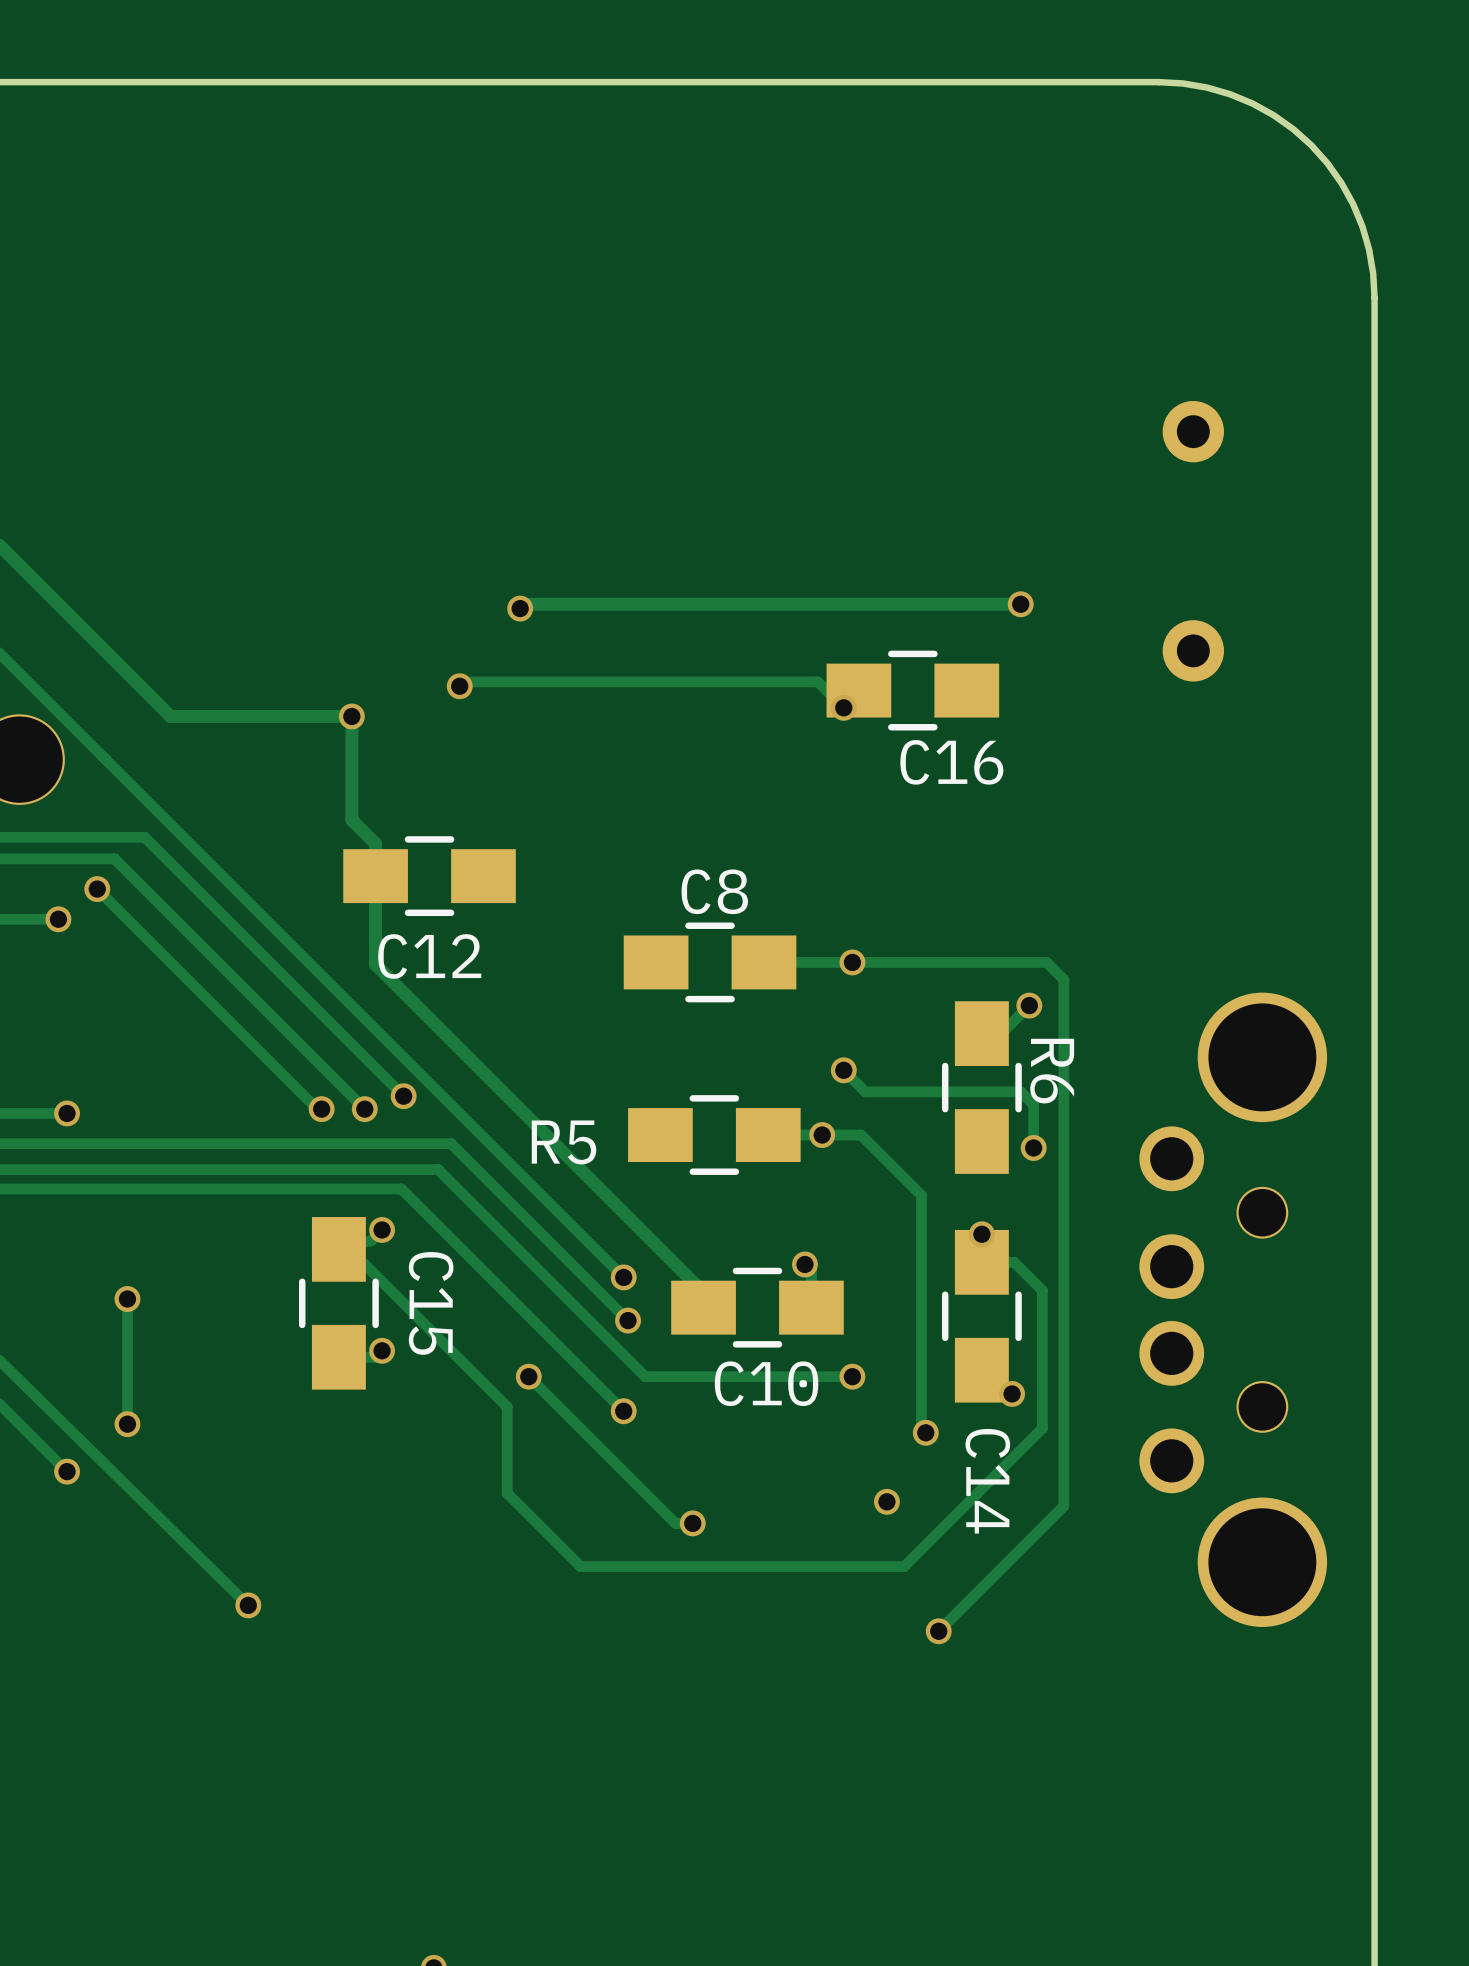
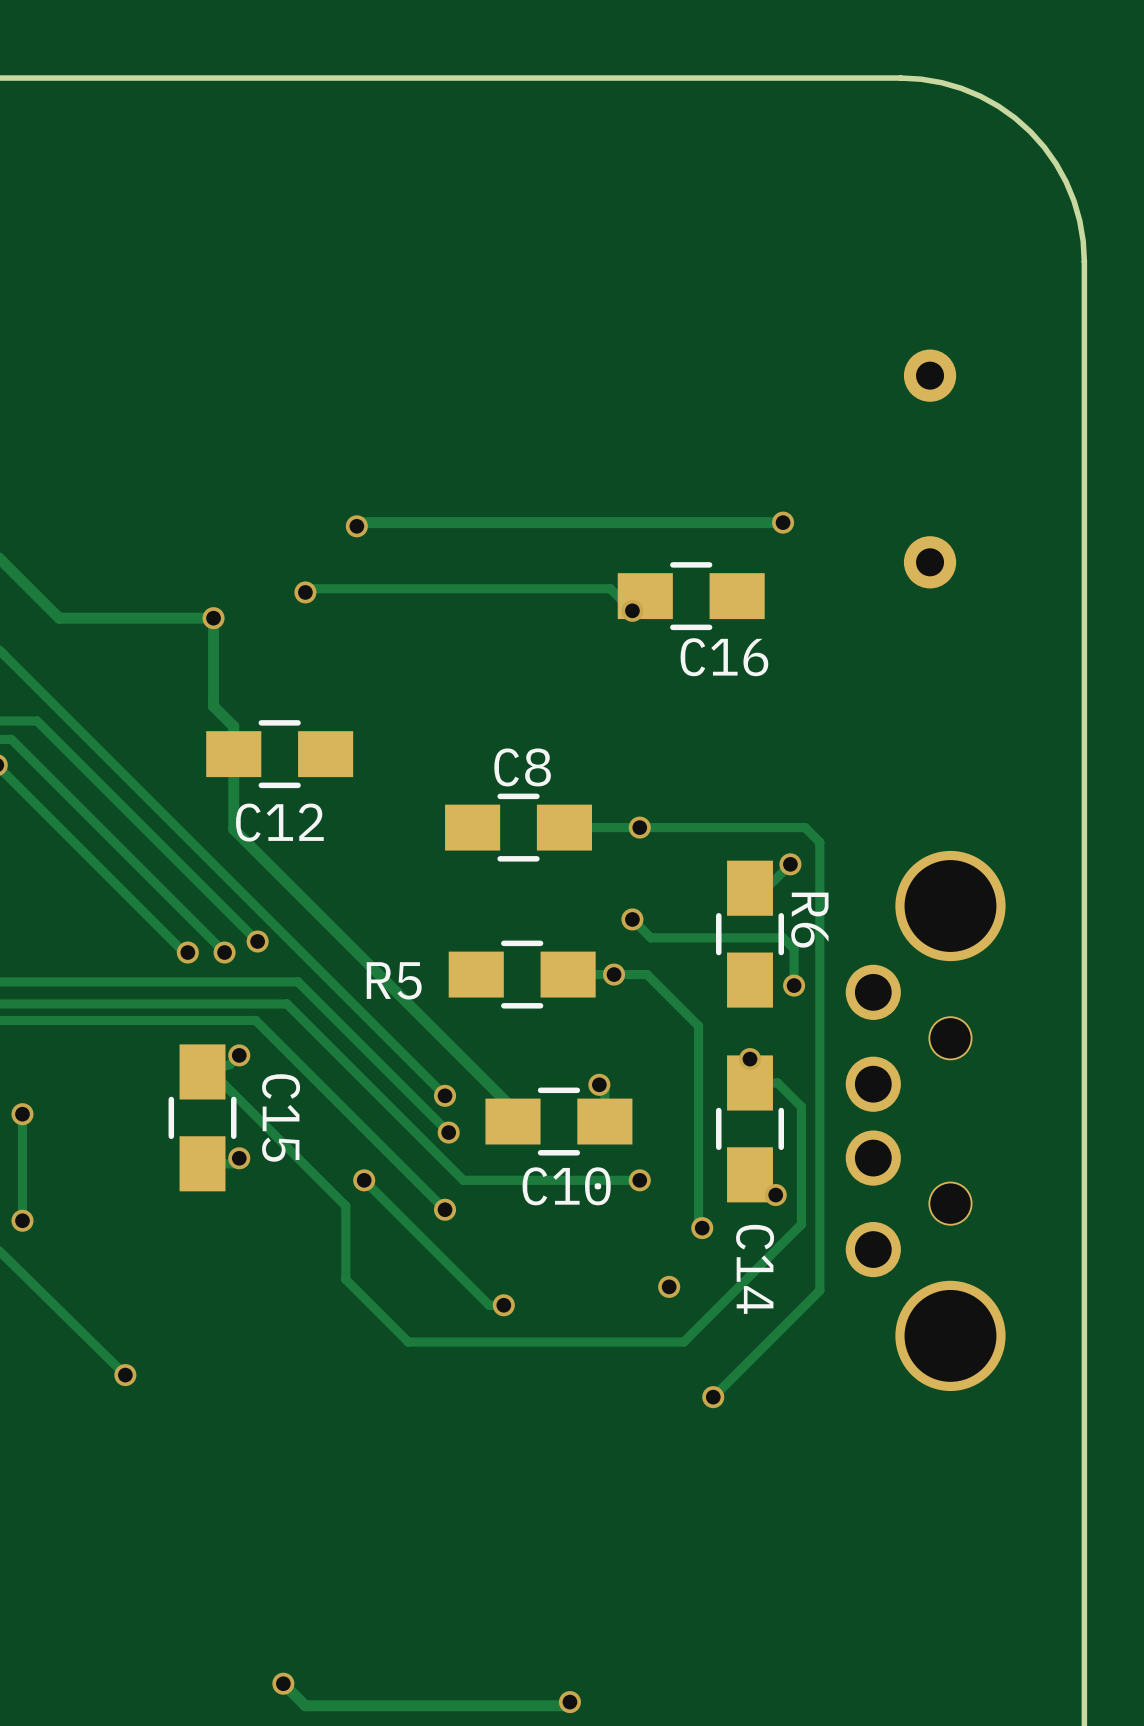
part position: (1233, 1309) -> (925, 1120)

